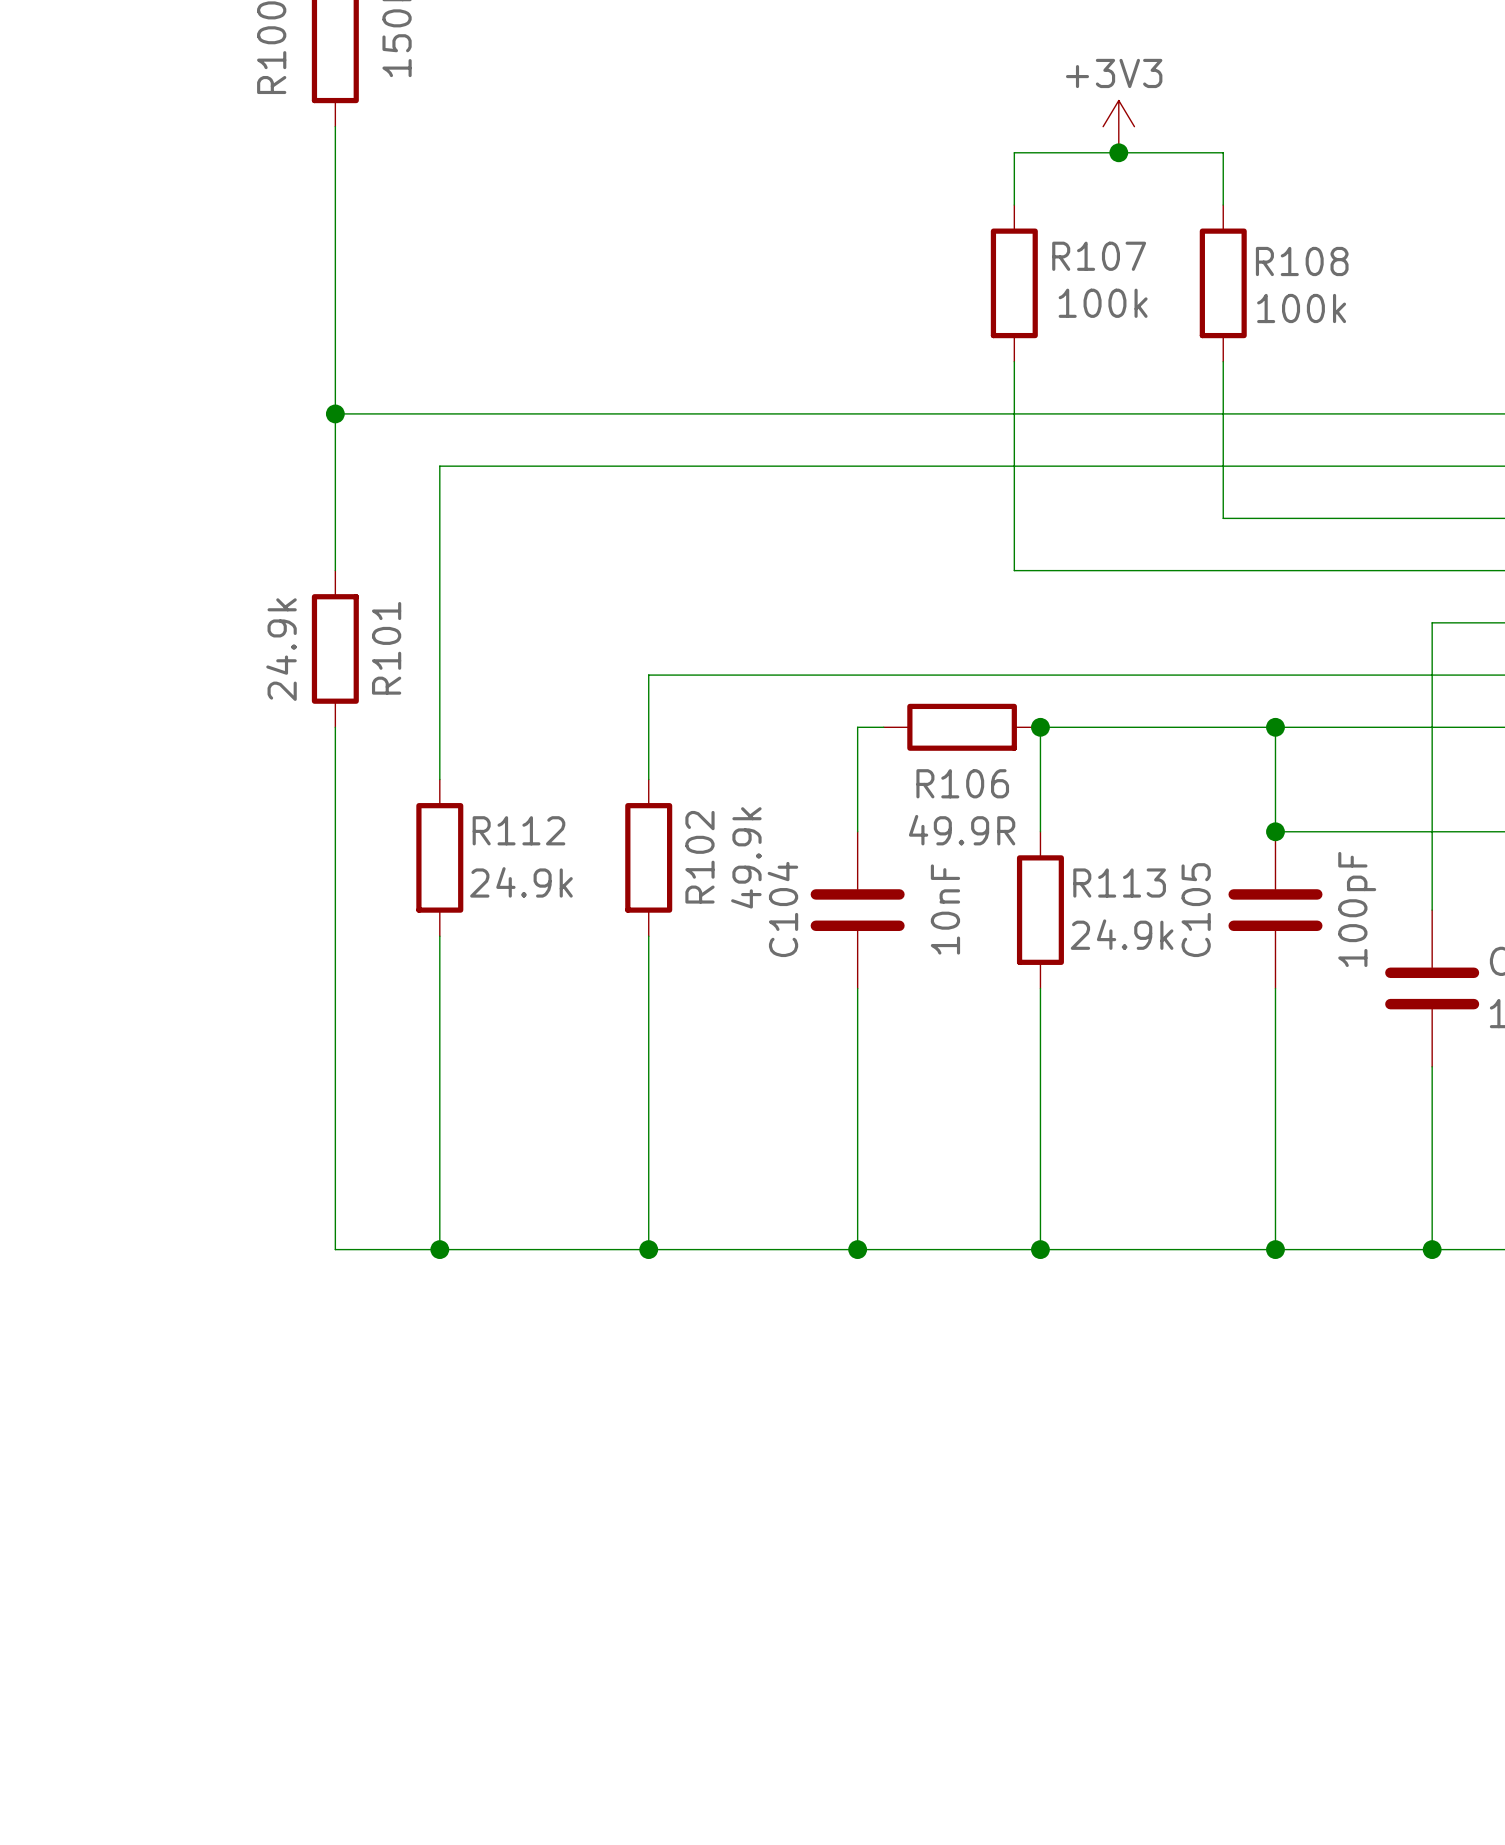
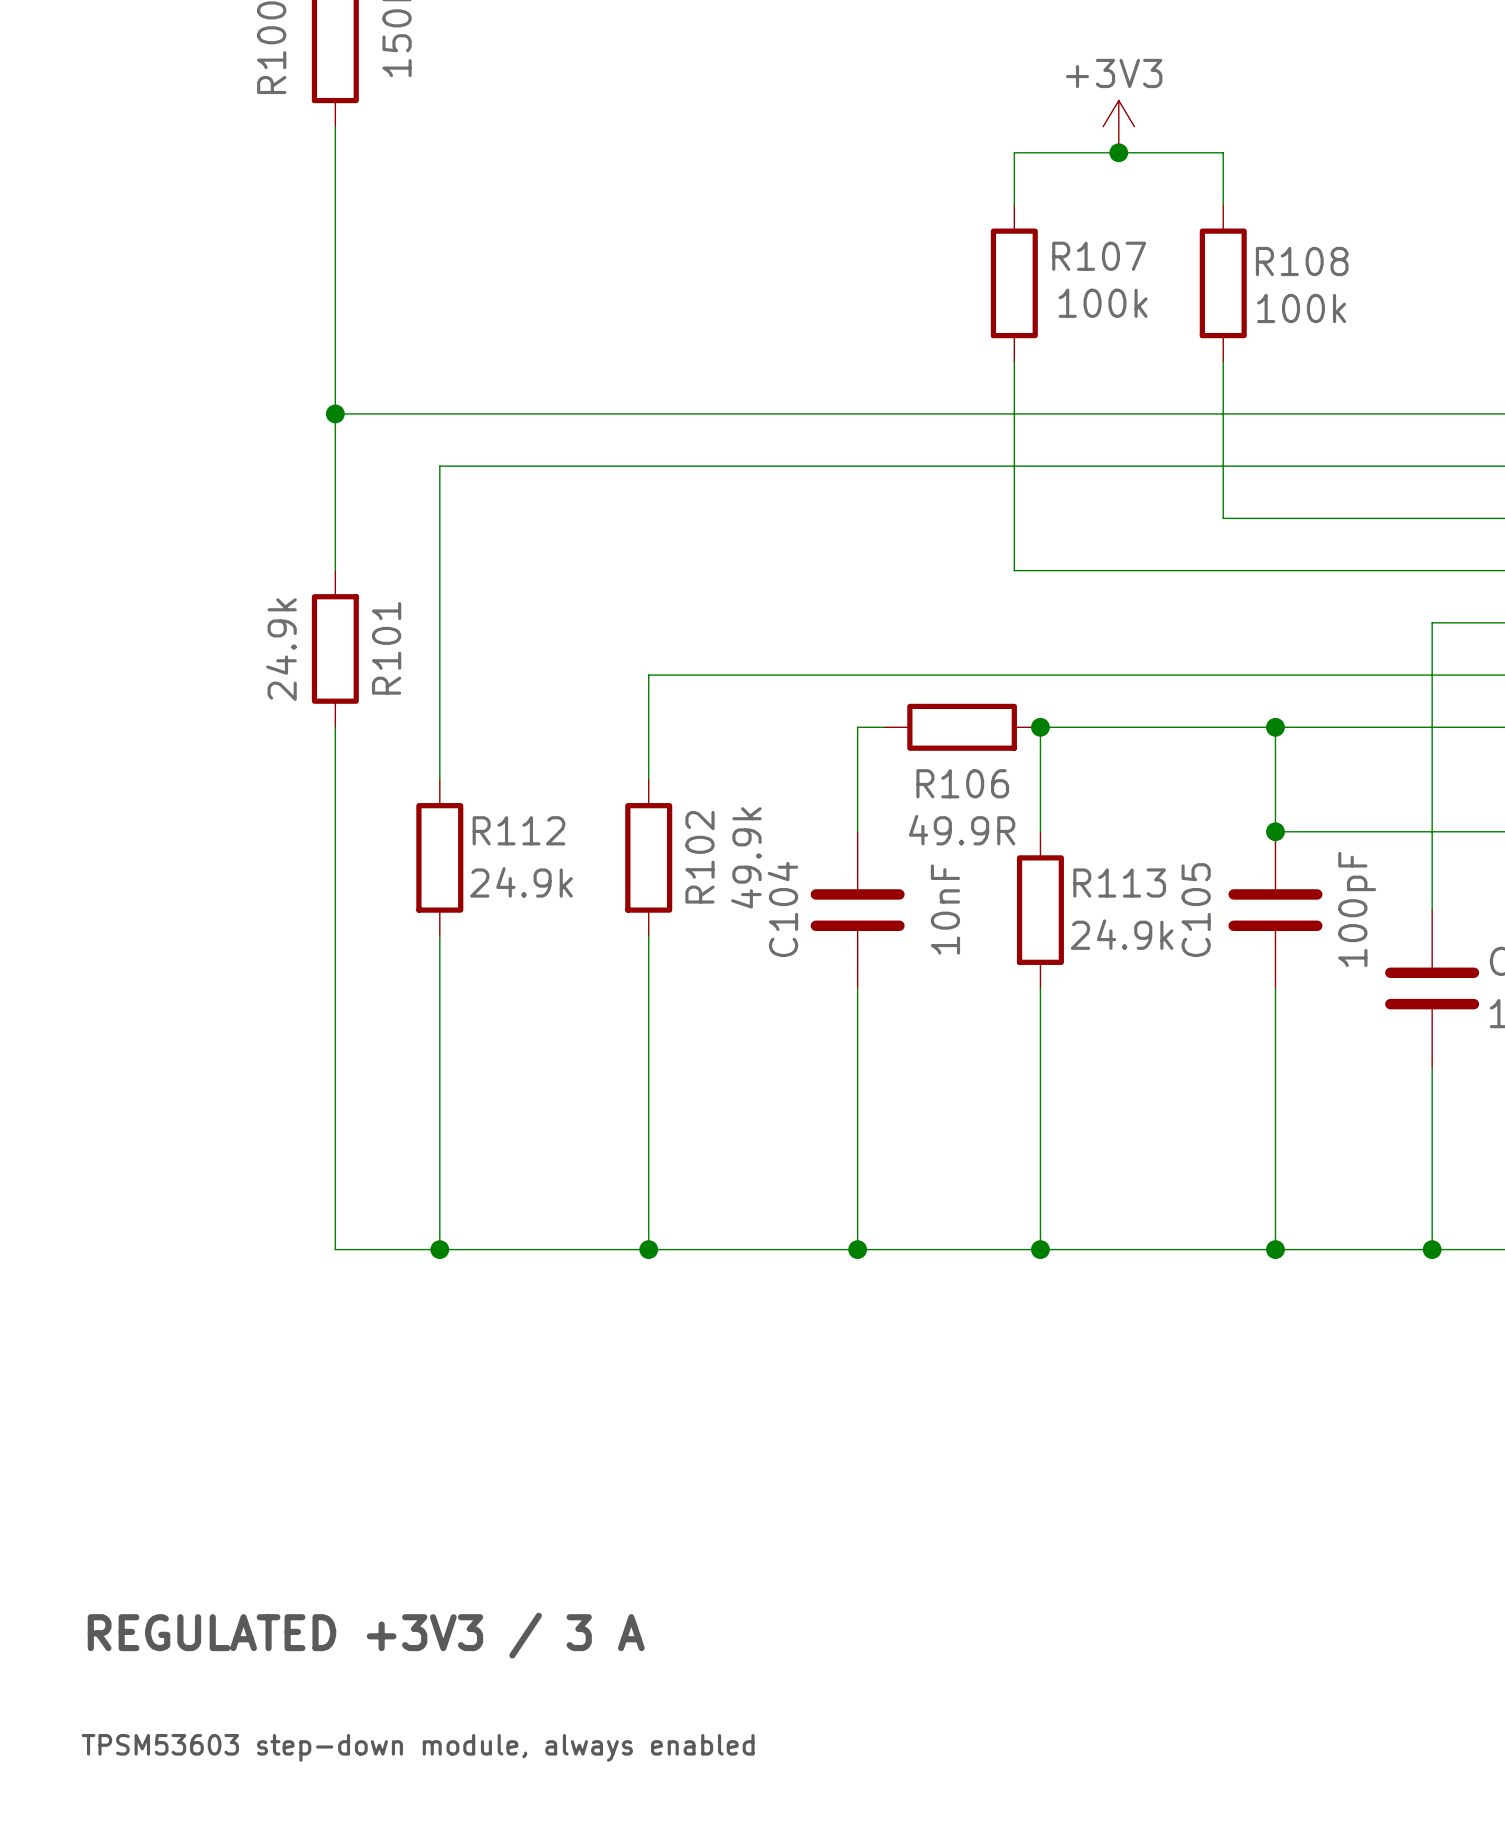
text: none -> REGULATED +3V3 / 3 A (366, 1635)
text: none -> TPSM53603 step-down module, always enabled (418, 1747)

